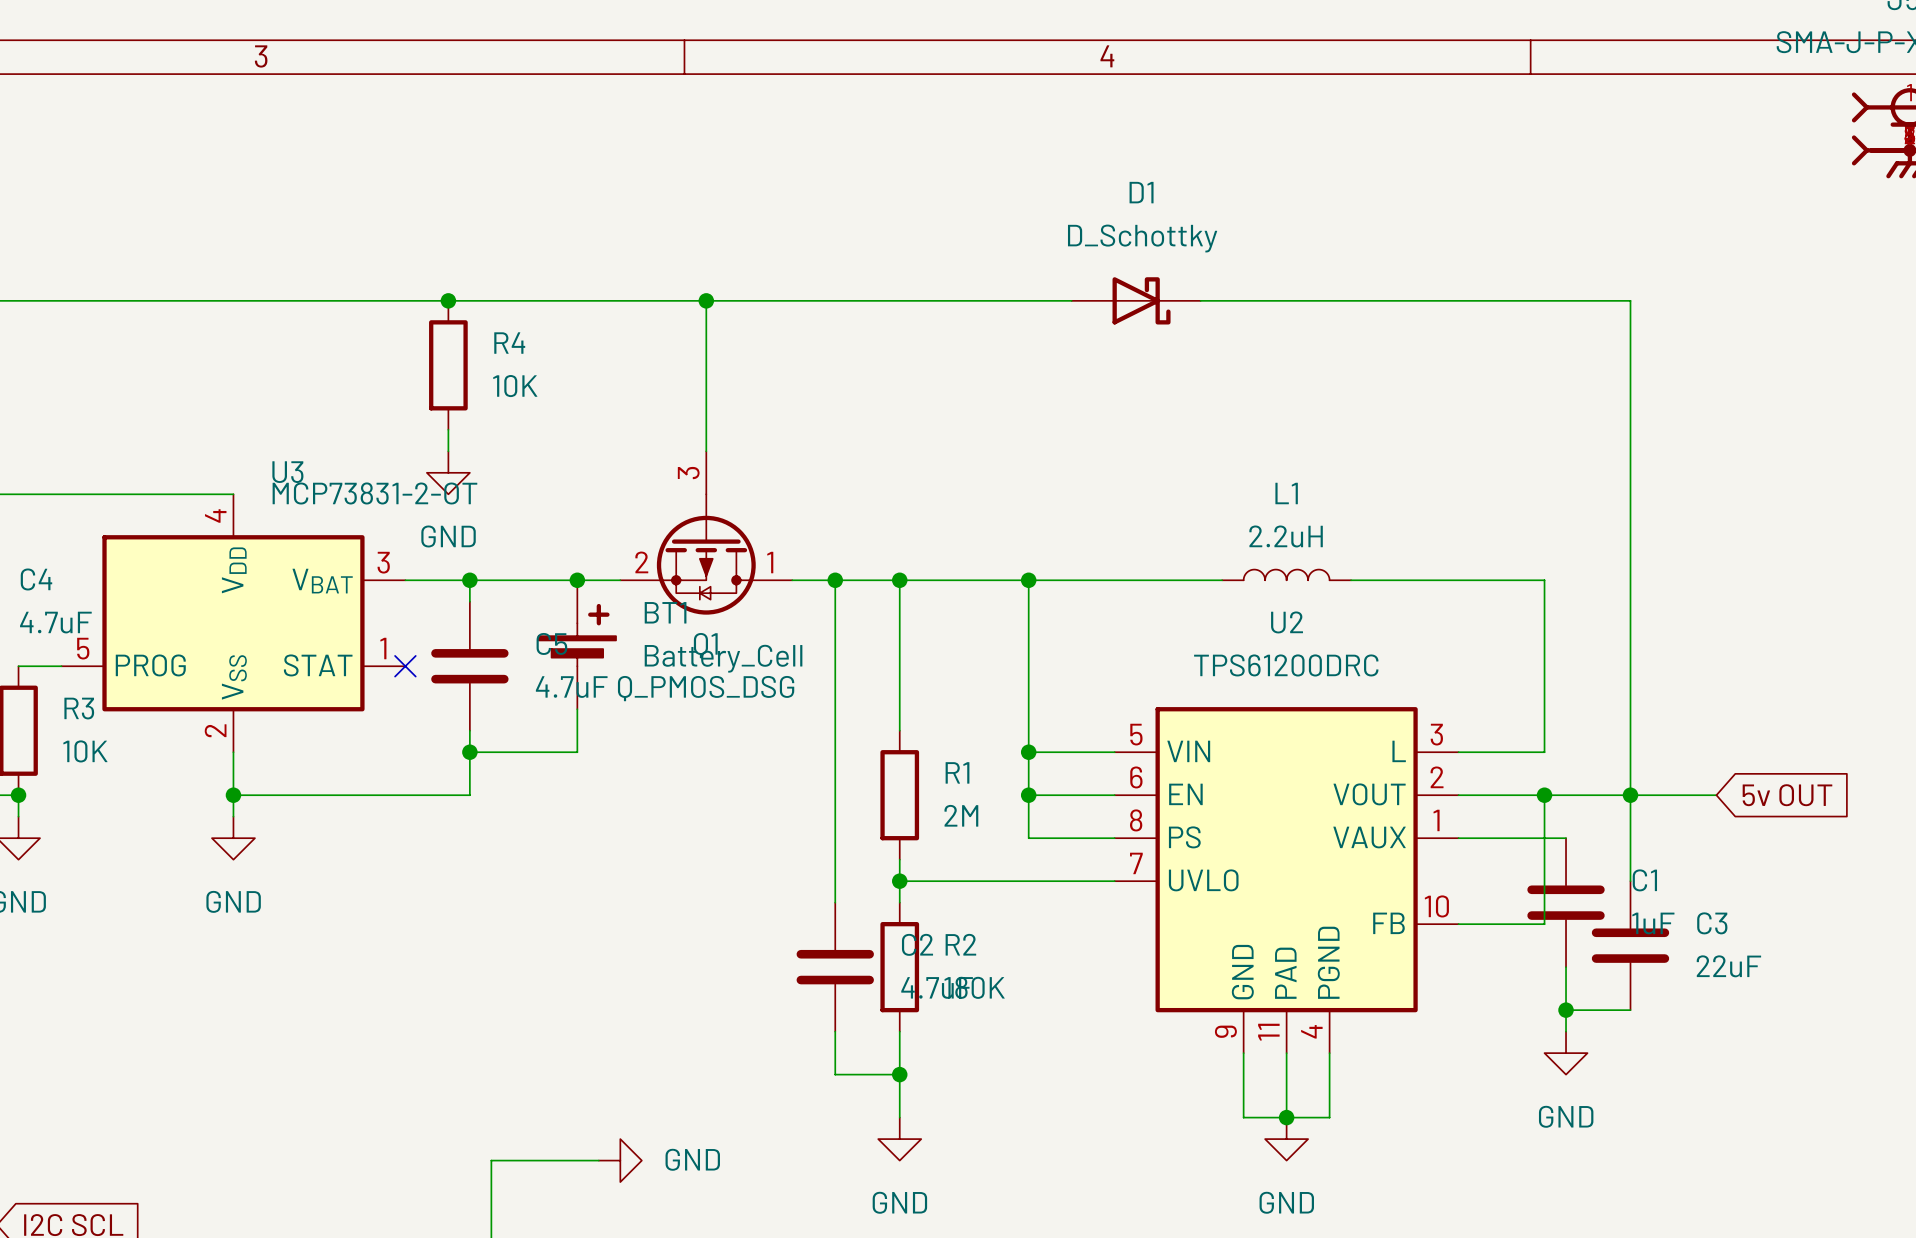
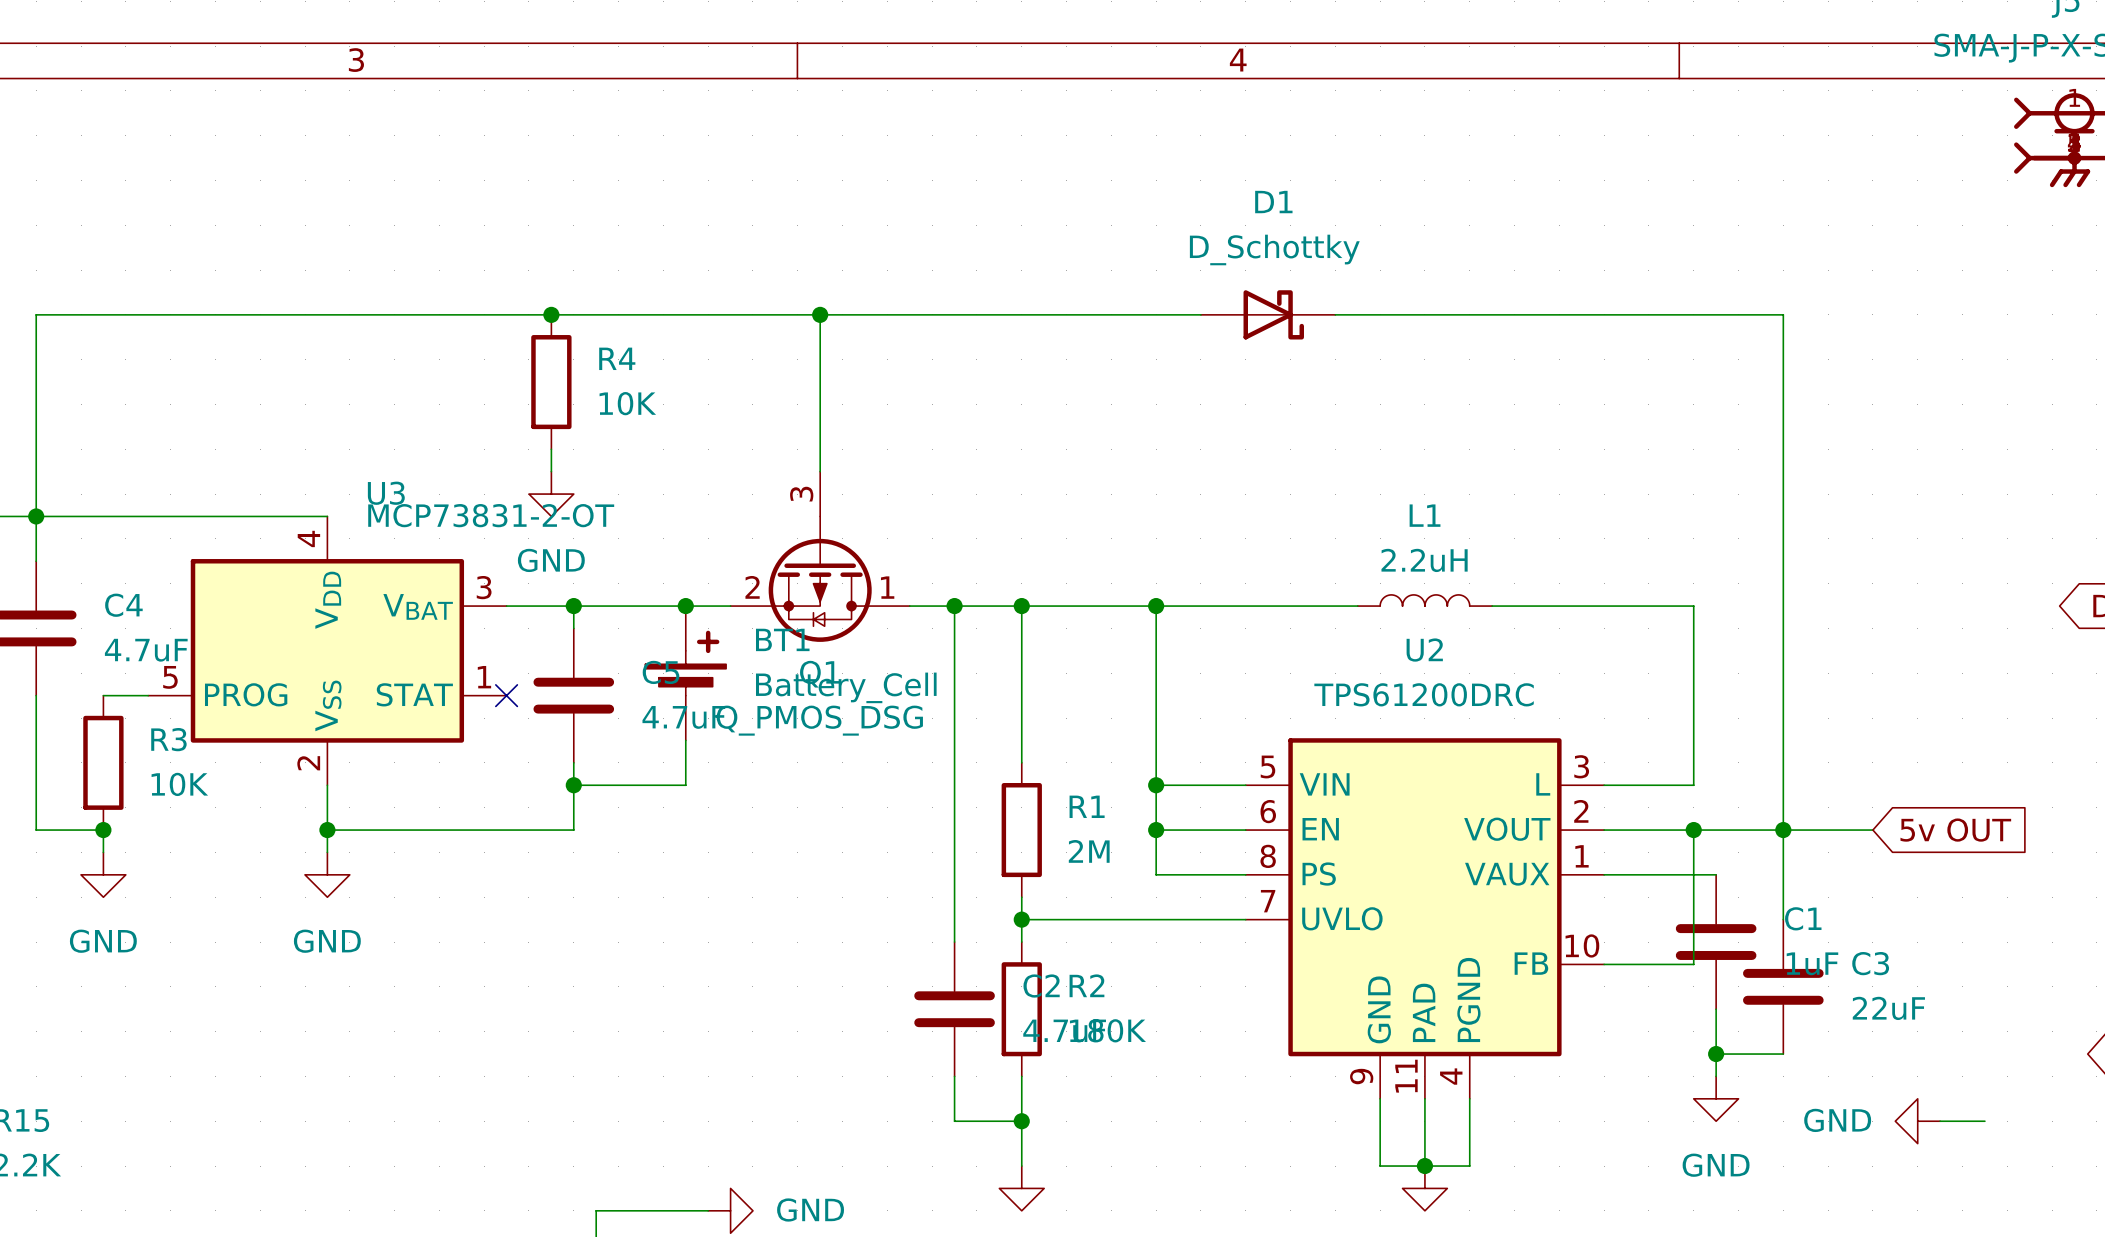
power symbol: none -> GND (1917, 1121)
wire: none -> (1940, 1121) (1984, 1121)

